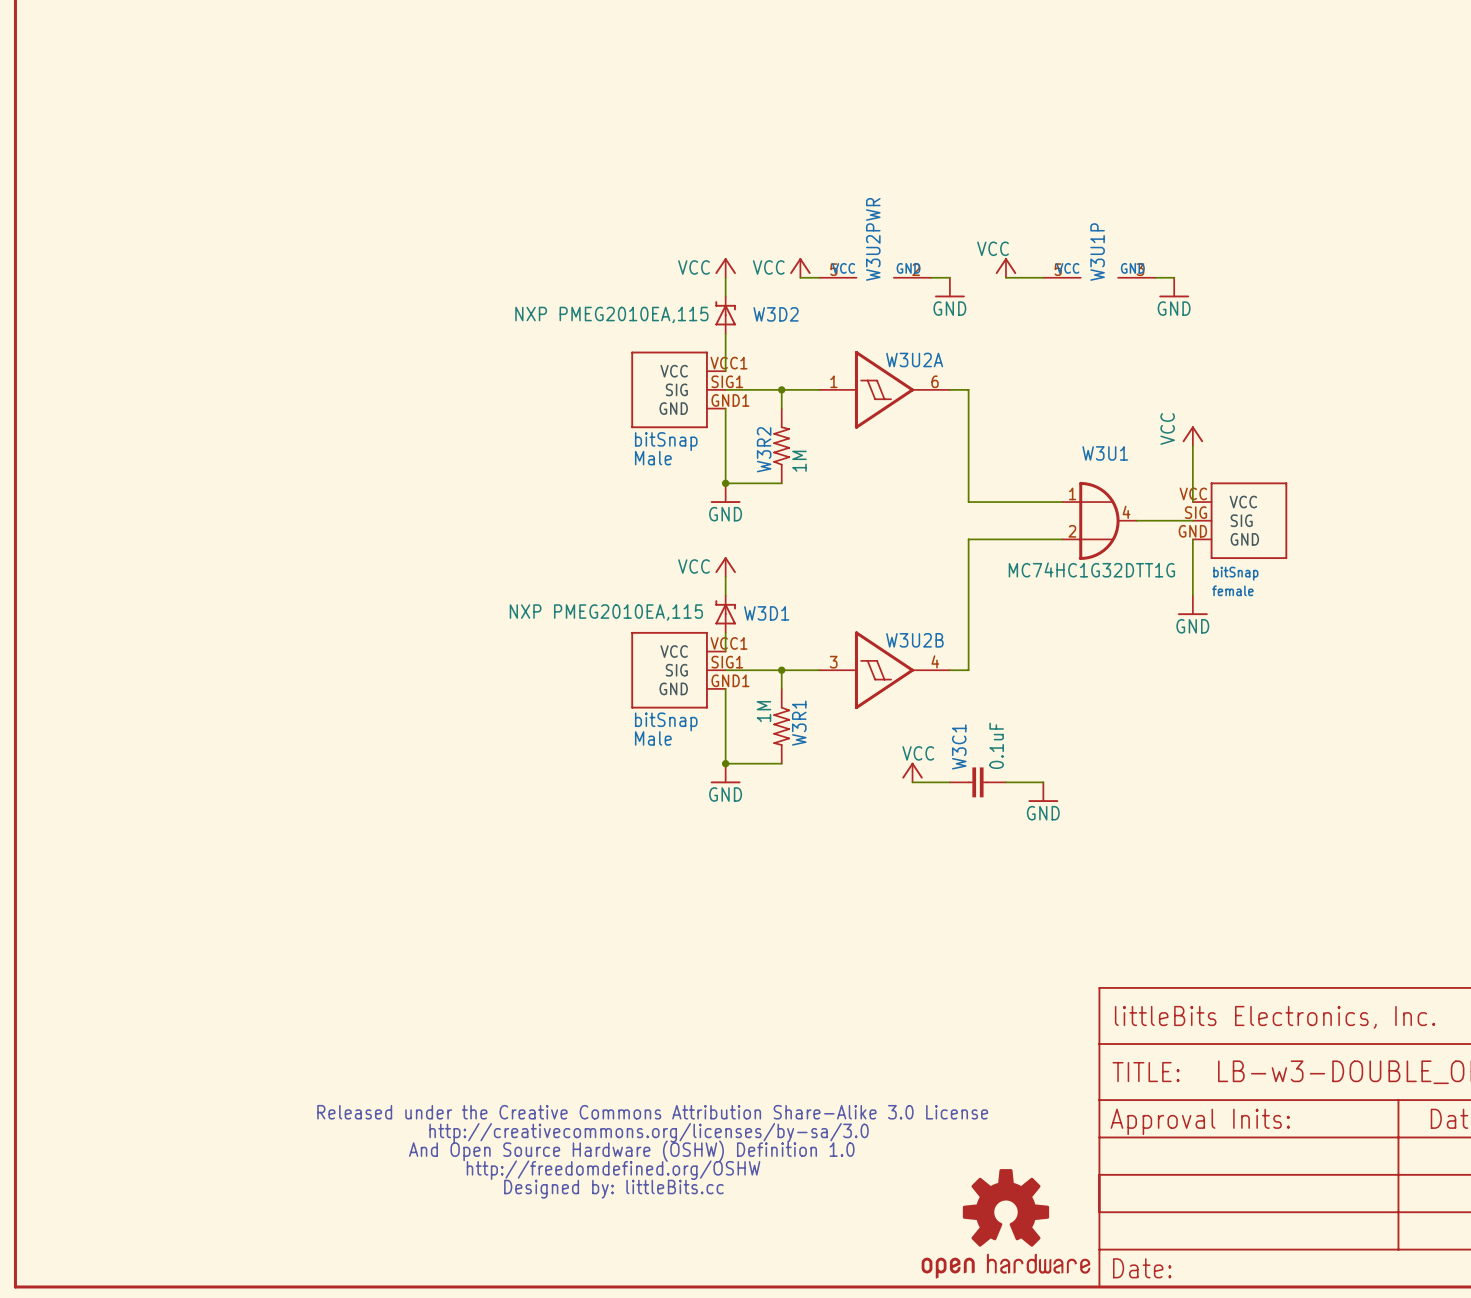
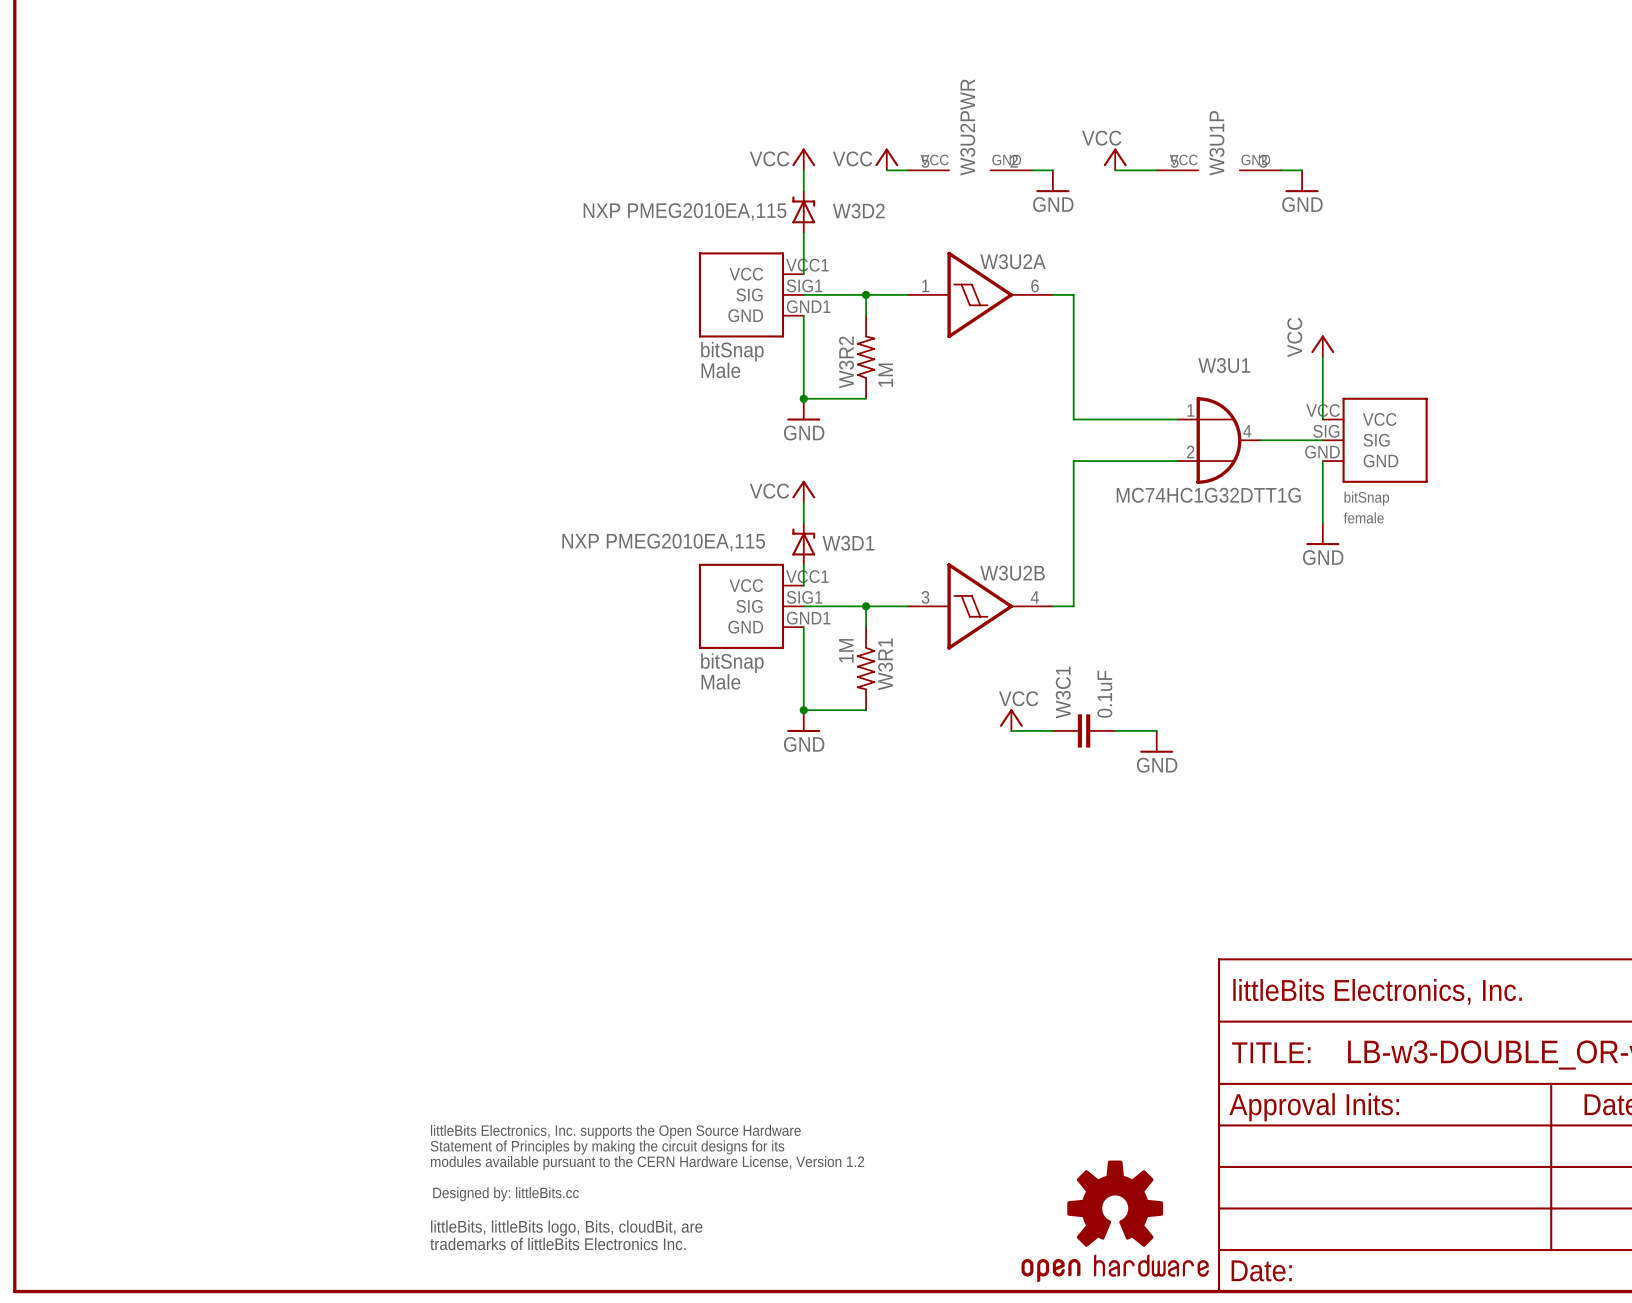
part: (652, 1151) -> none
part: none -> (647, 1187)

